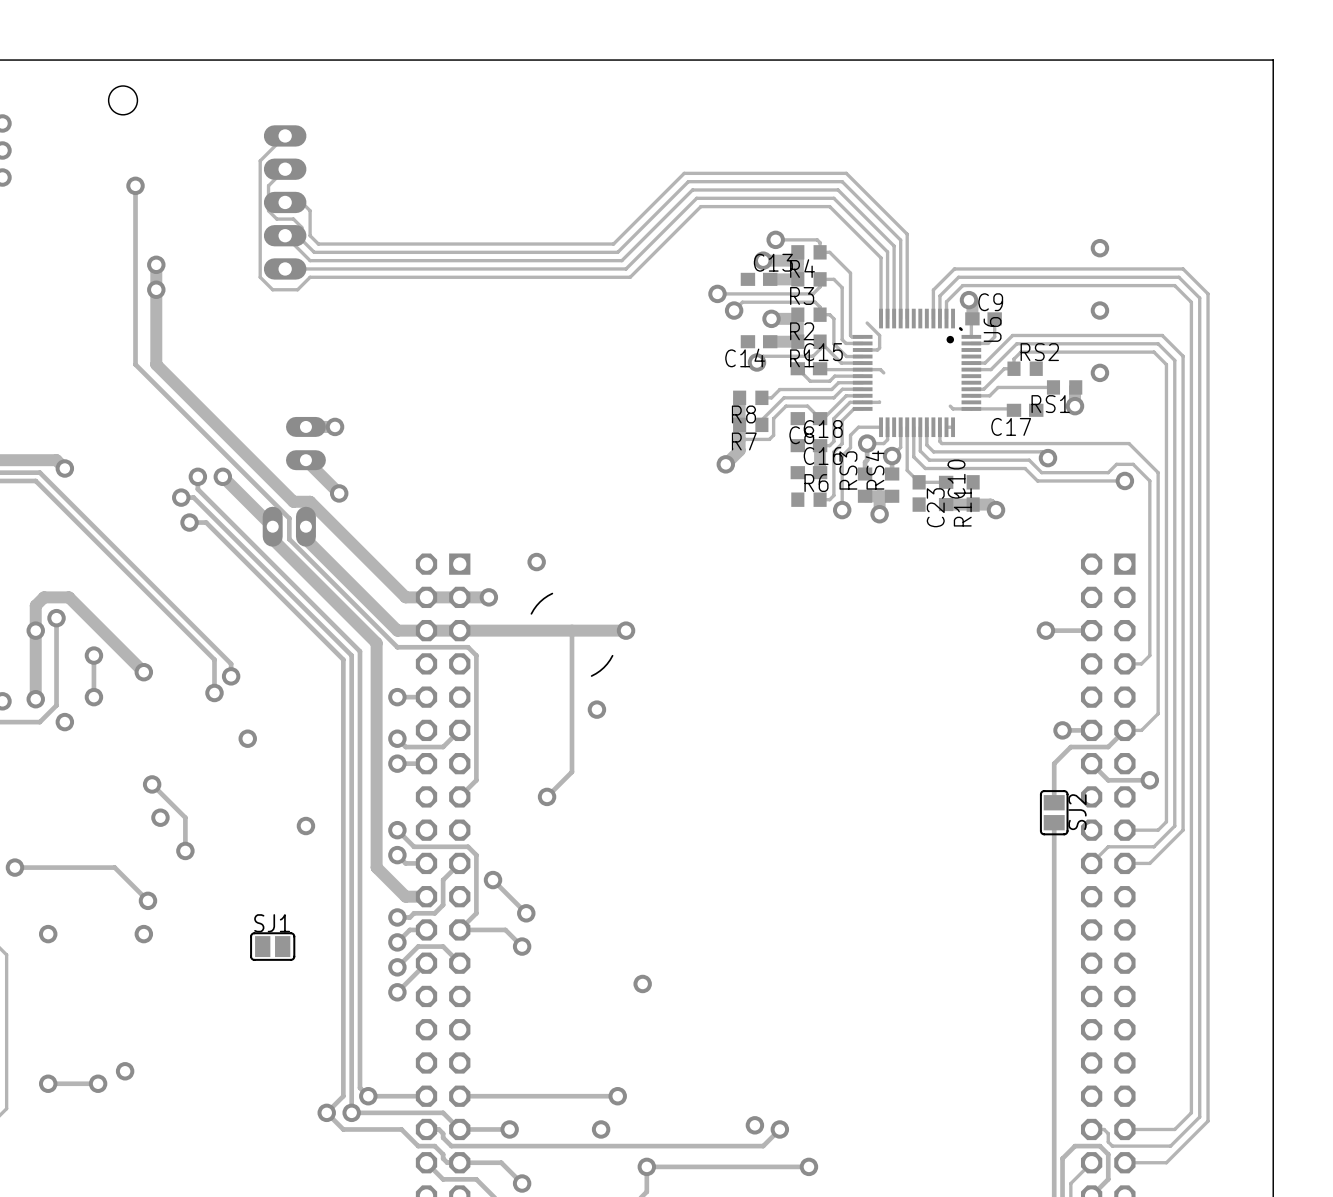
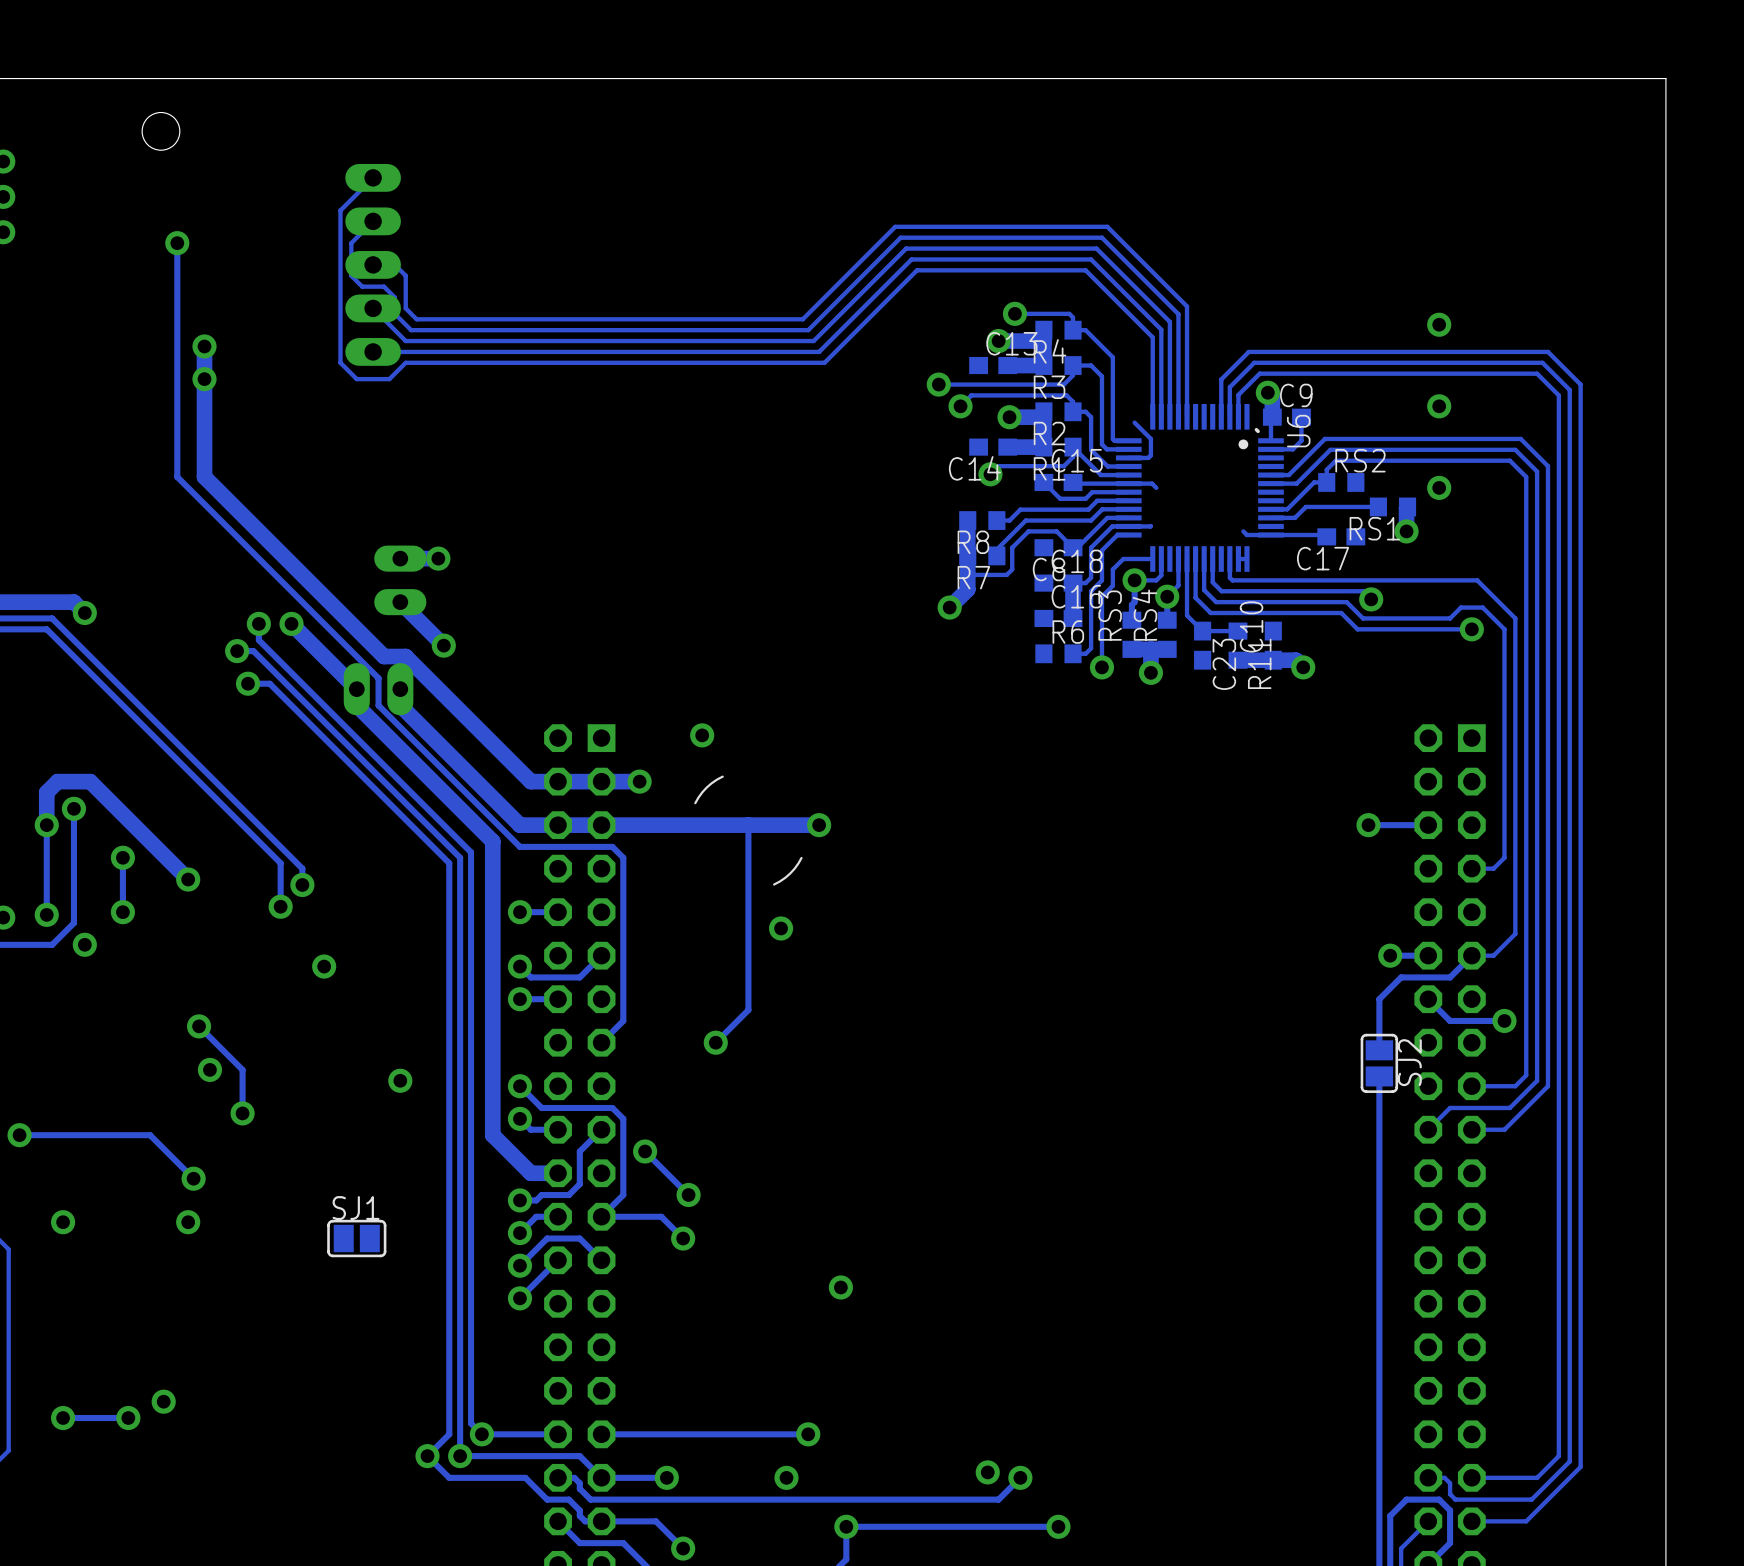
track width: thick (35, 630) (35, 699) -> thin (46, 825) (46, 914)

